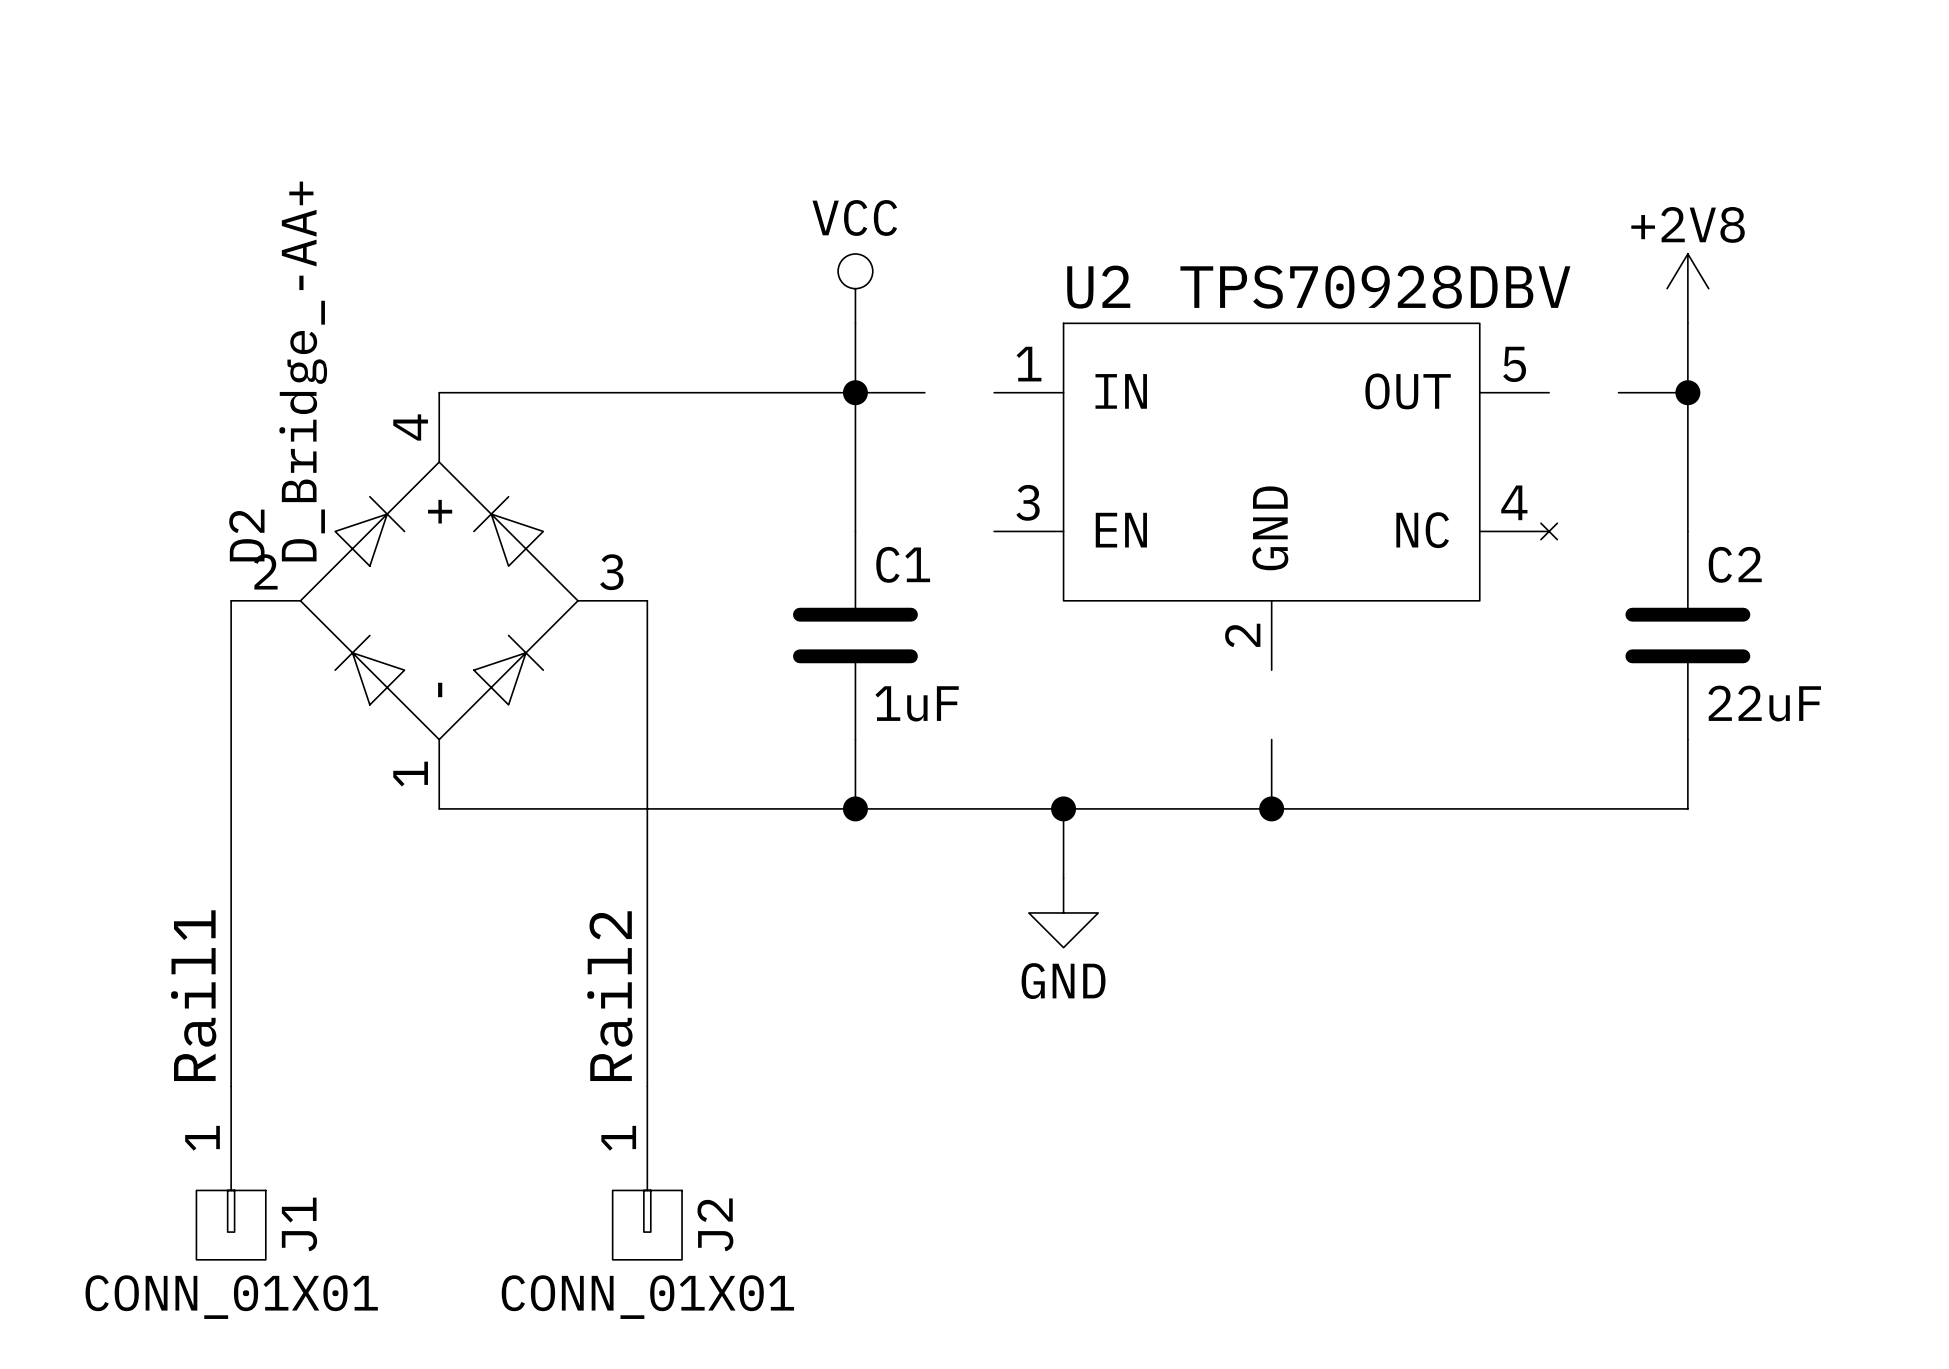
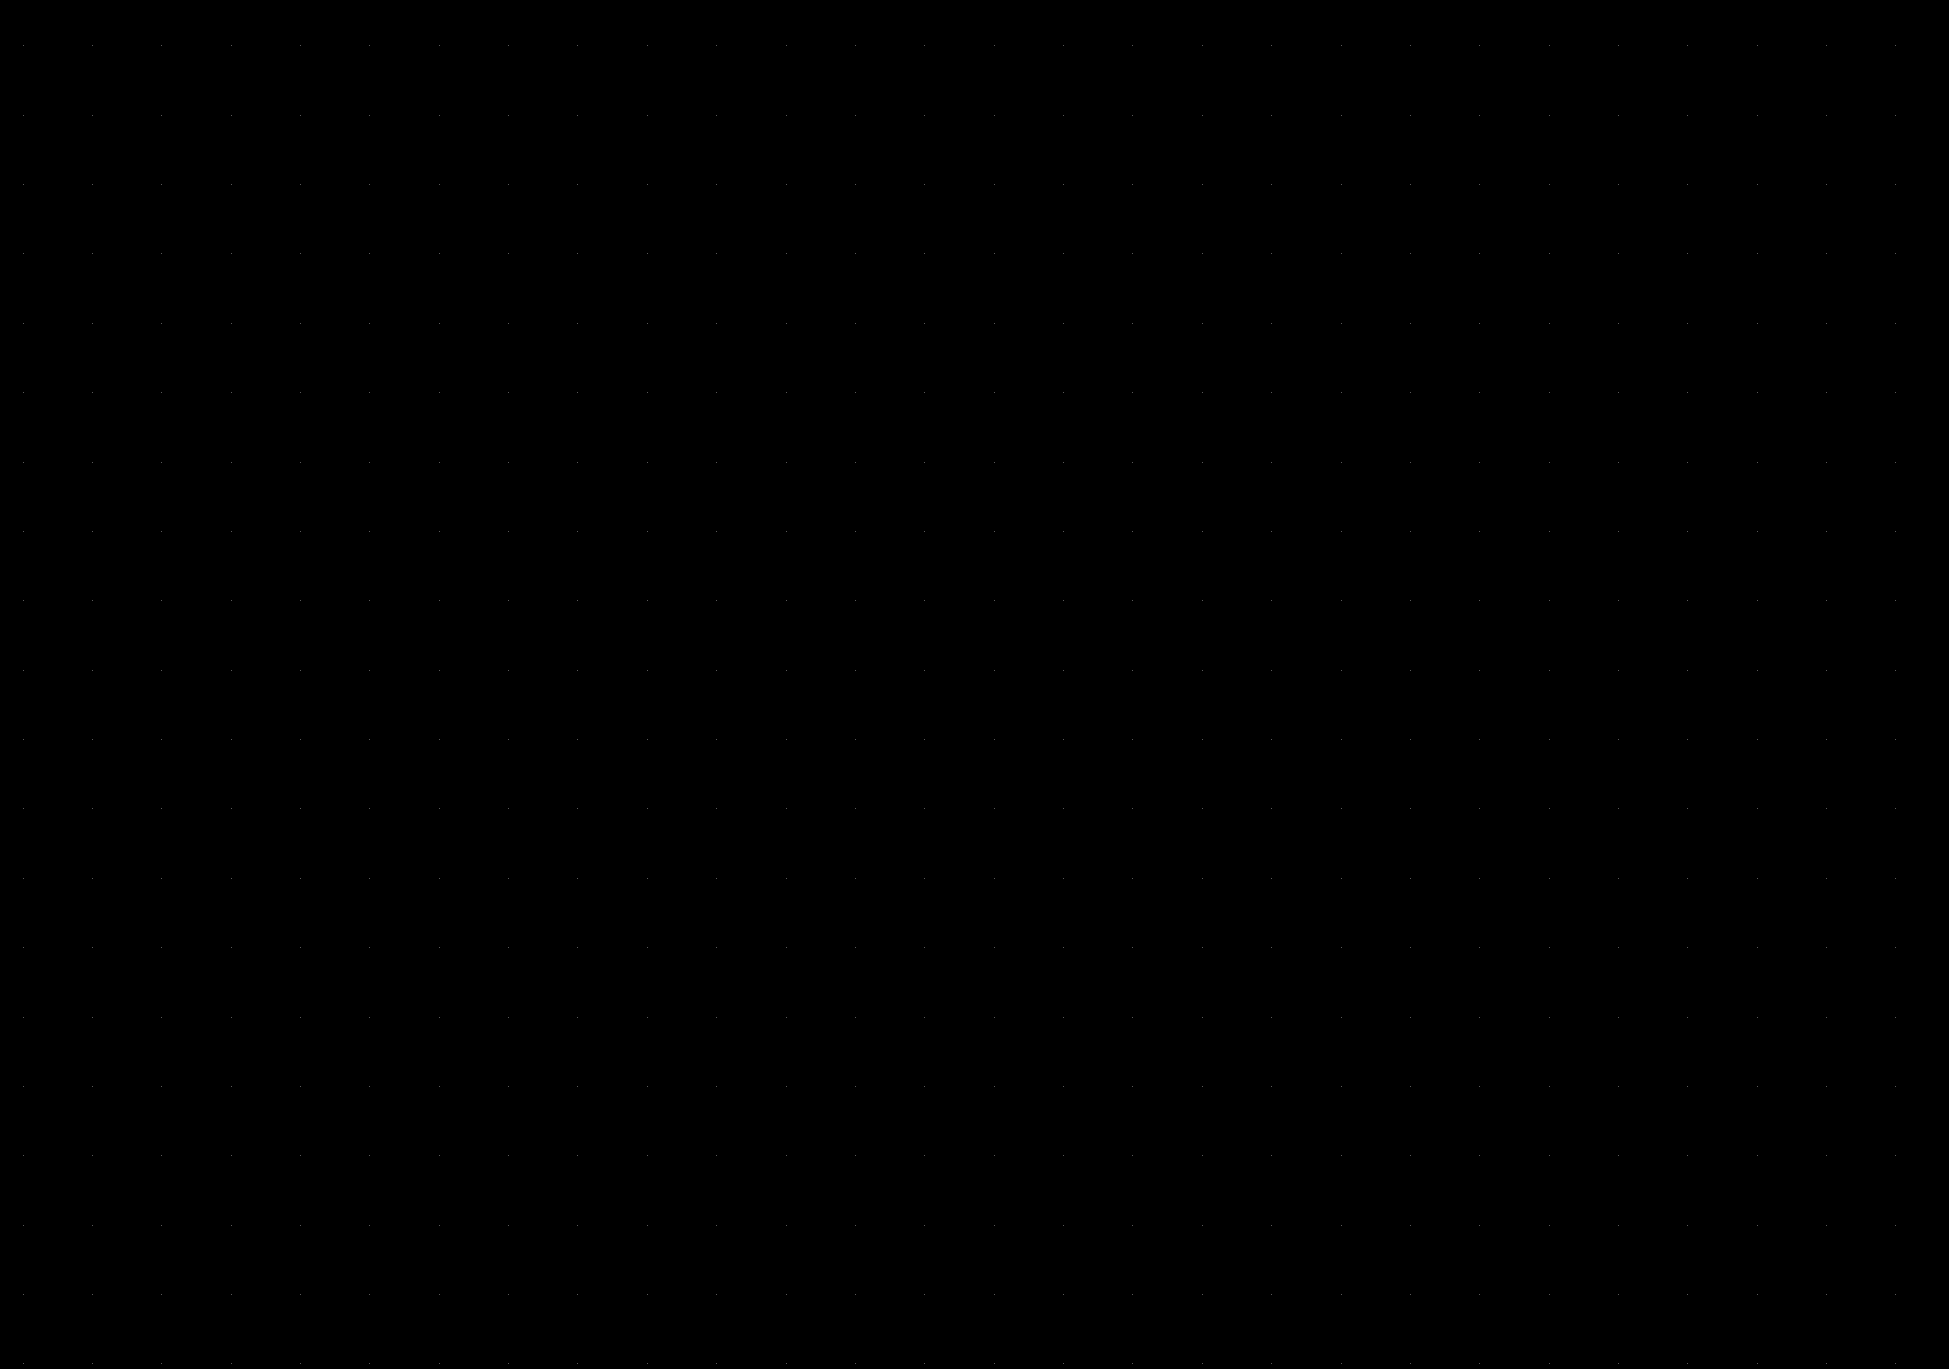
power symbol: VCC (855, 288) -> none
power symbol: +2V8 (1687, 288) -> none
wire: (855, 323) (855, 531) -> none
wire: (1687, 323) (1687, 531) -> none
wire: (439, 392) (924, 392) -> none
junction: (855, 392) -> none
wire: (1618, 392) (1687, 392) -> none
junction: (1687, 392) -> none
U2: TPS70928DBV (1275, 496) -> none
wire: (231, 600) (231, 1086) -> none
D2: D_Bridge_-AA+ (439, 600) -> none
wire: (647, 600) (647, 1086) -> none
C1: 1uF (855, 635) -> none
C2: 22uF (1687, 635) -> none
wire: (855, 739) (855, 808) -> none
wire: (1271, 739) (1271, 808) -> none
wire: (1687, 739) (1687, 808) (439, 808) -> none
junction: (855, 808) -> none
wire: (1063, 808) (1063, 878) -> none
junction: (1063, 808) -> none
junction: (1271, 808) -> none
power symbol: GND (1063, 912) -> none
label: Rail1 (193, 995) -> none
label: Rail2 (609, 996) -> none
J1: CONN_01X01 (231, 1173) -> none
J2: CONN_01X01 (647, 1173) -> none

